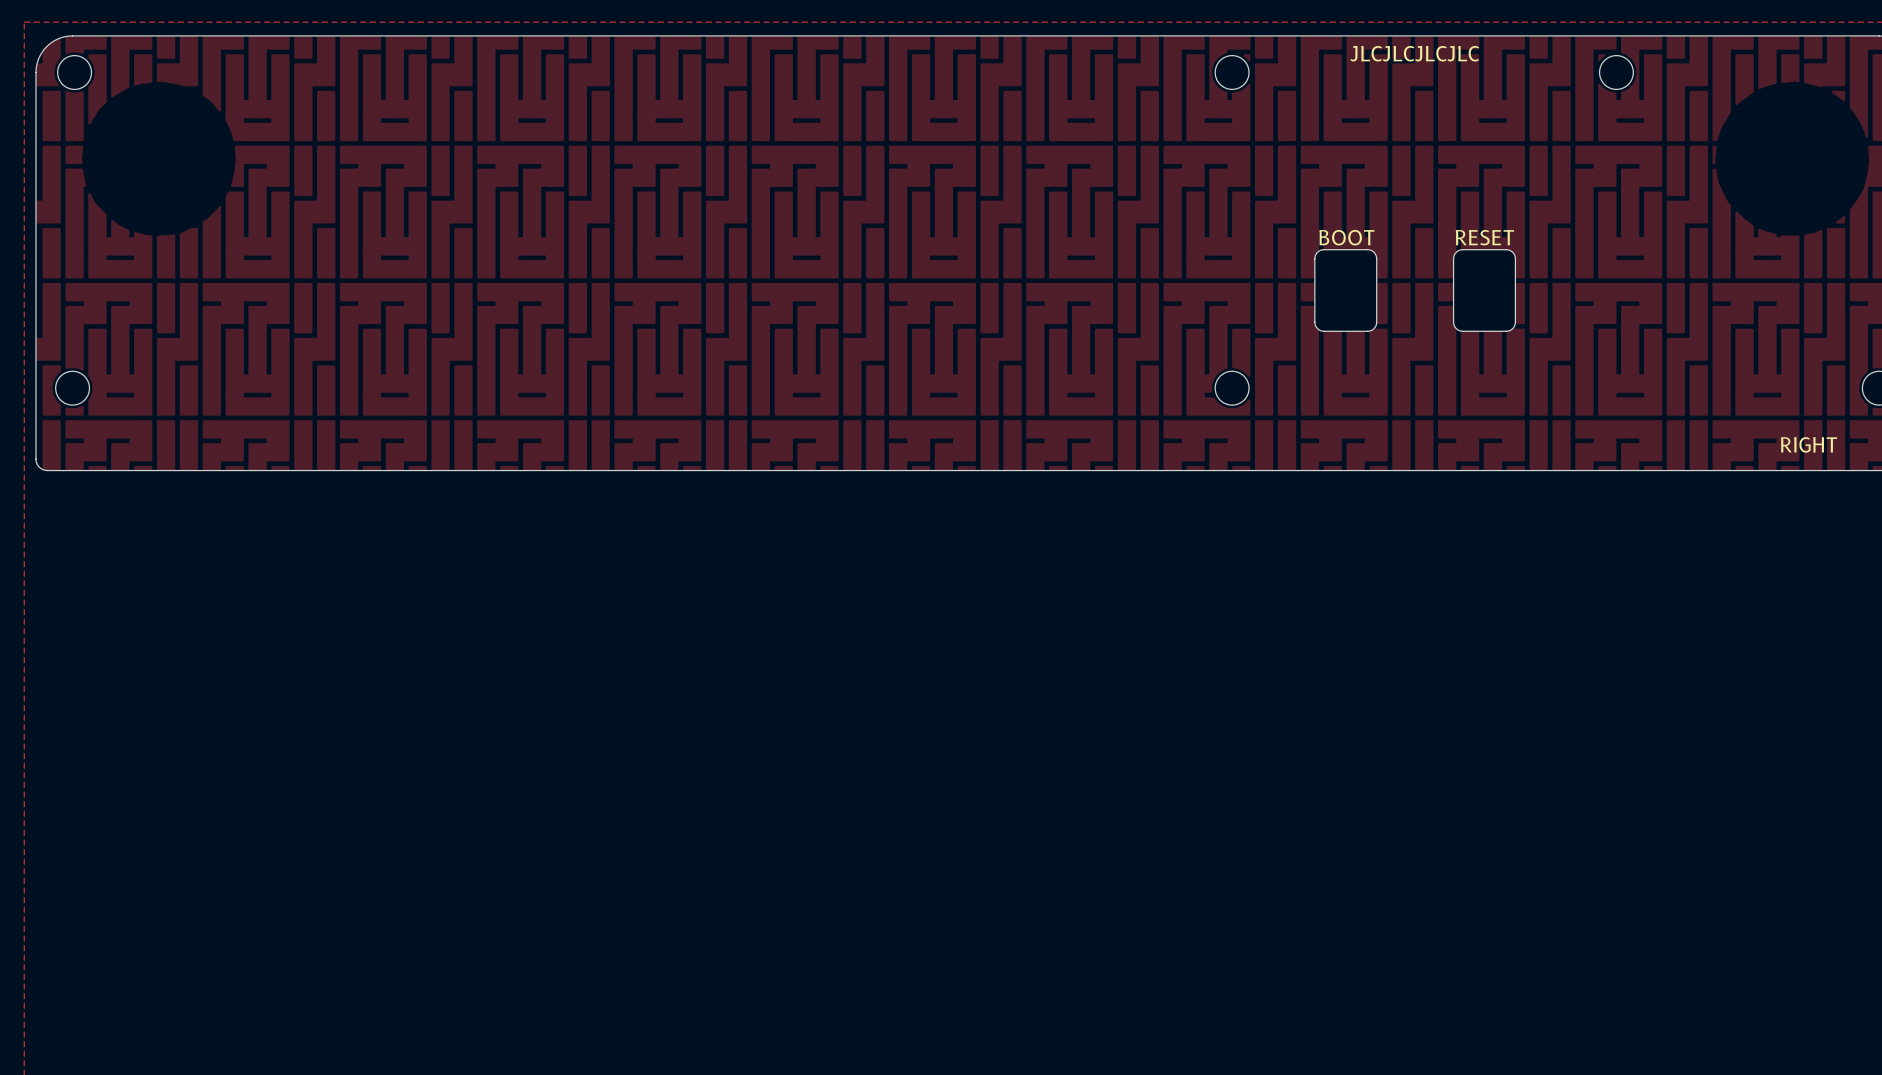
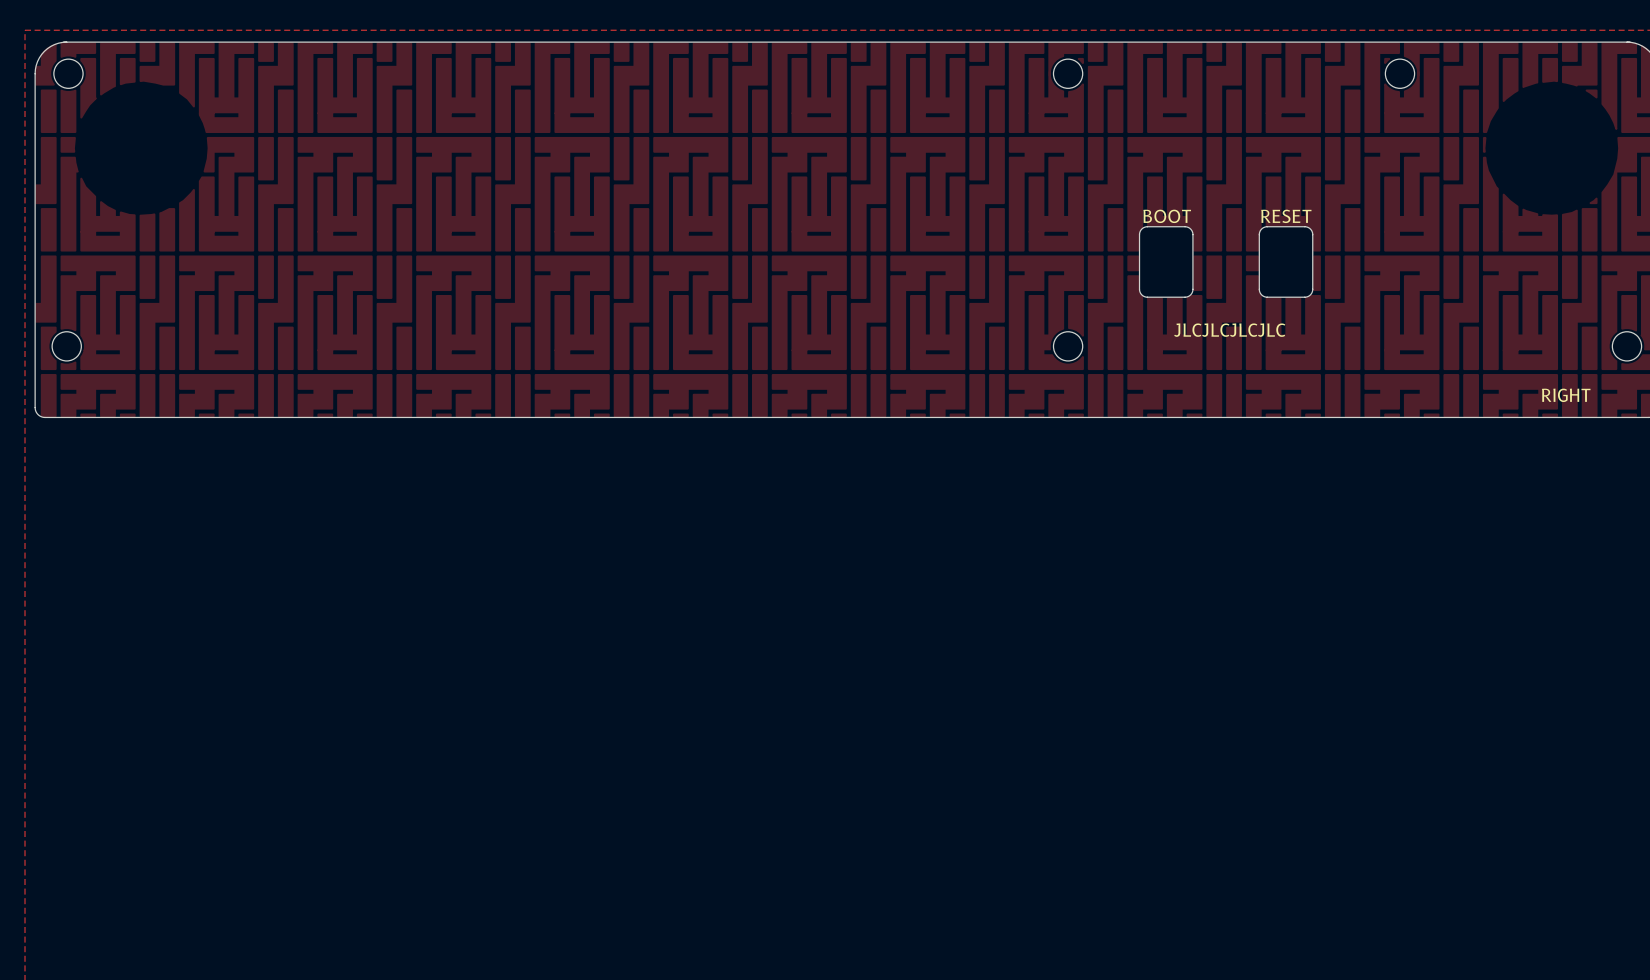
text position: JLCJLCJLCJLC (1414, 53) -> JLCJLCJLCJLC (1229, 330)

